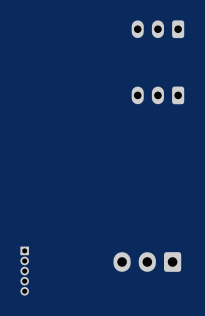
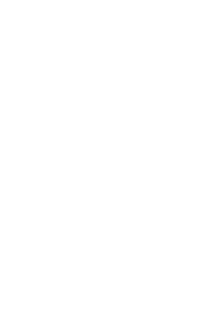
part: (157, 29) -> none
part: (157, 95) -> none
part: (147, 261) -> none
part: (24, 271) -> none

